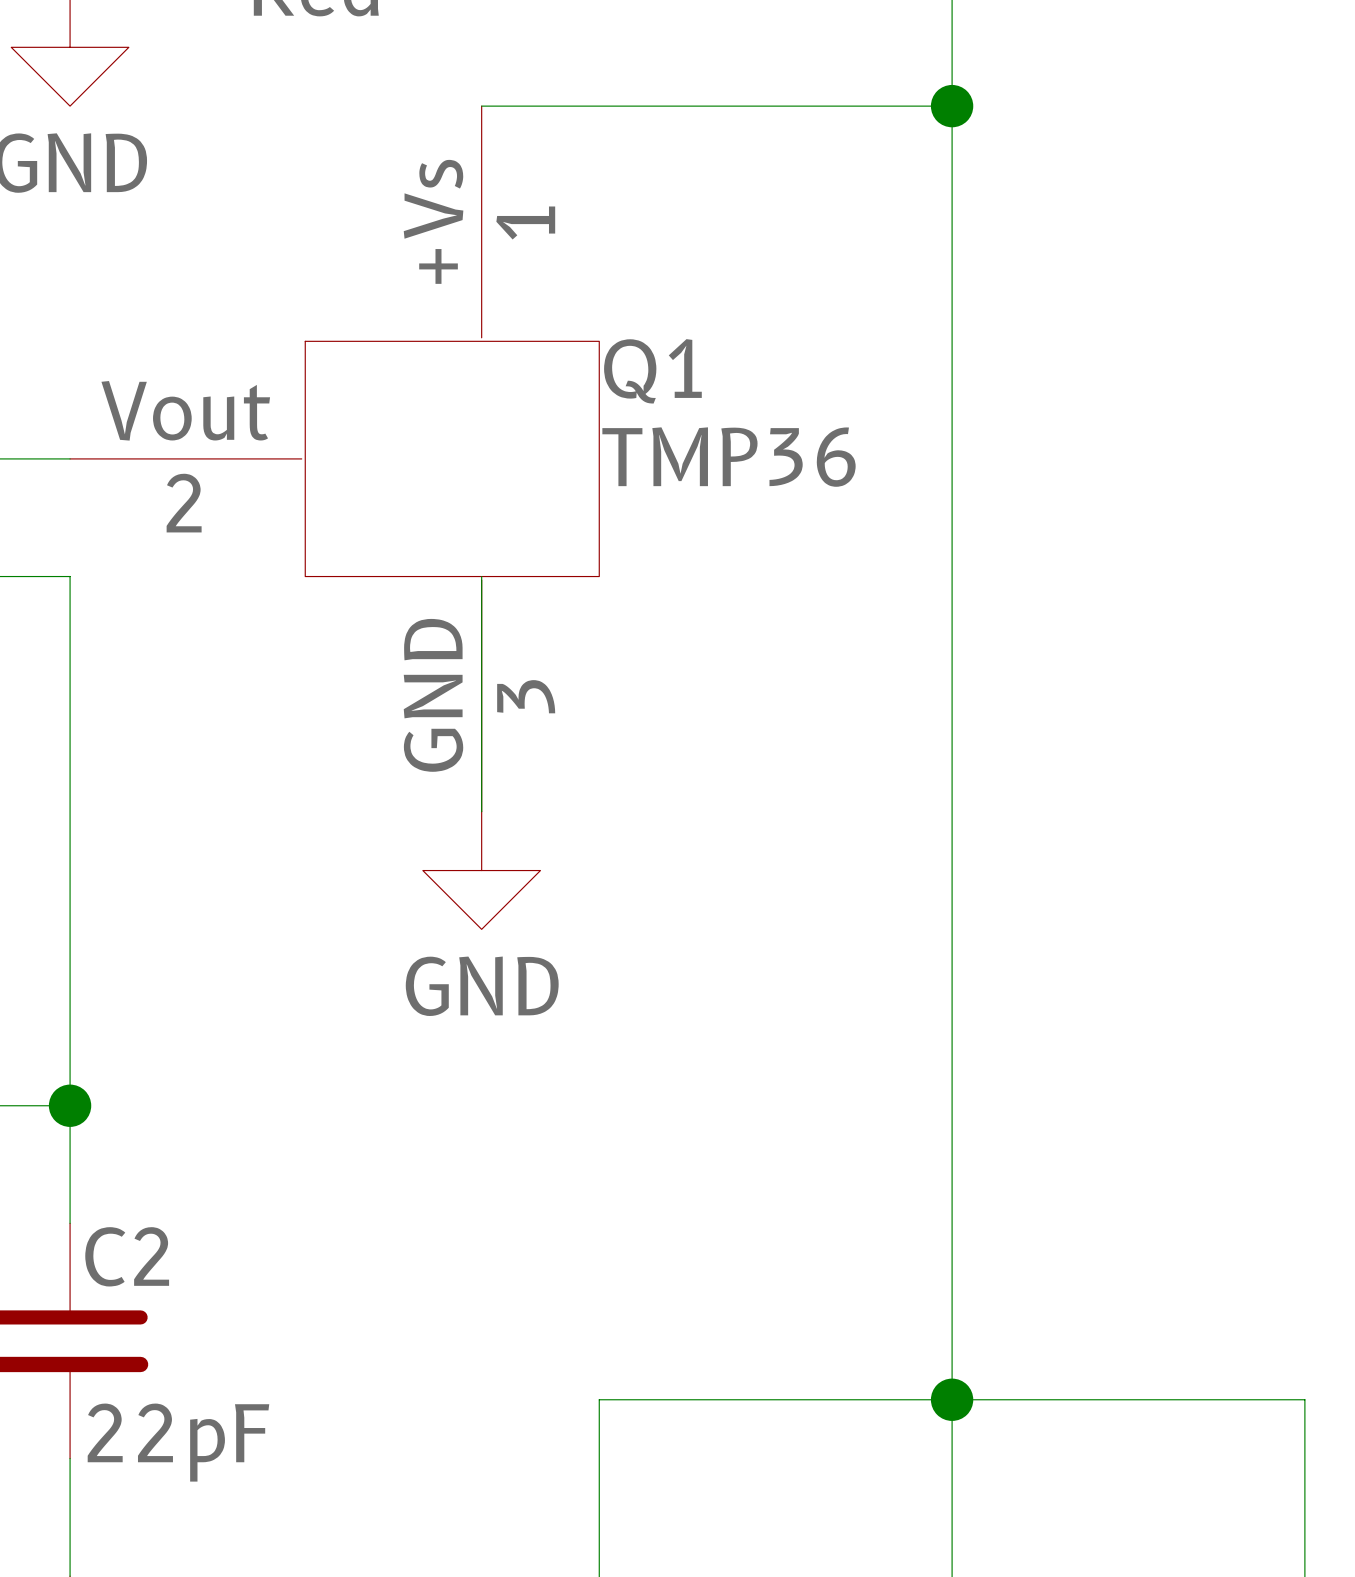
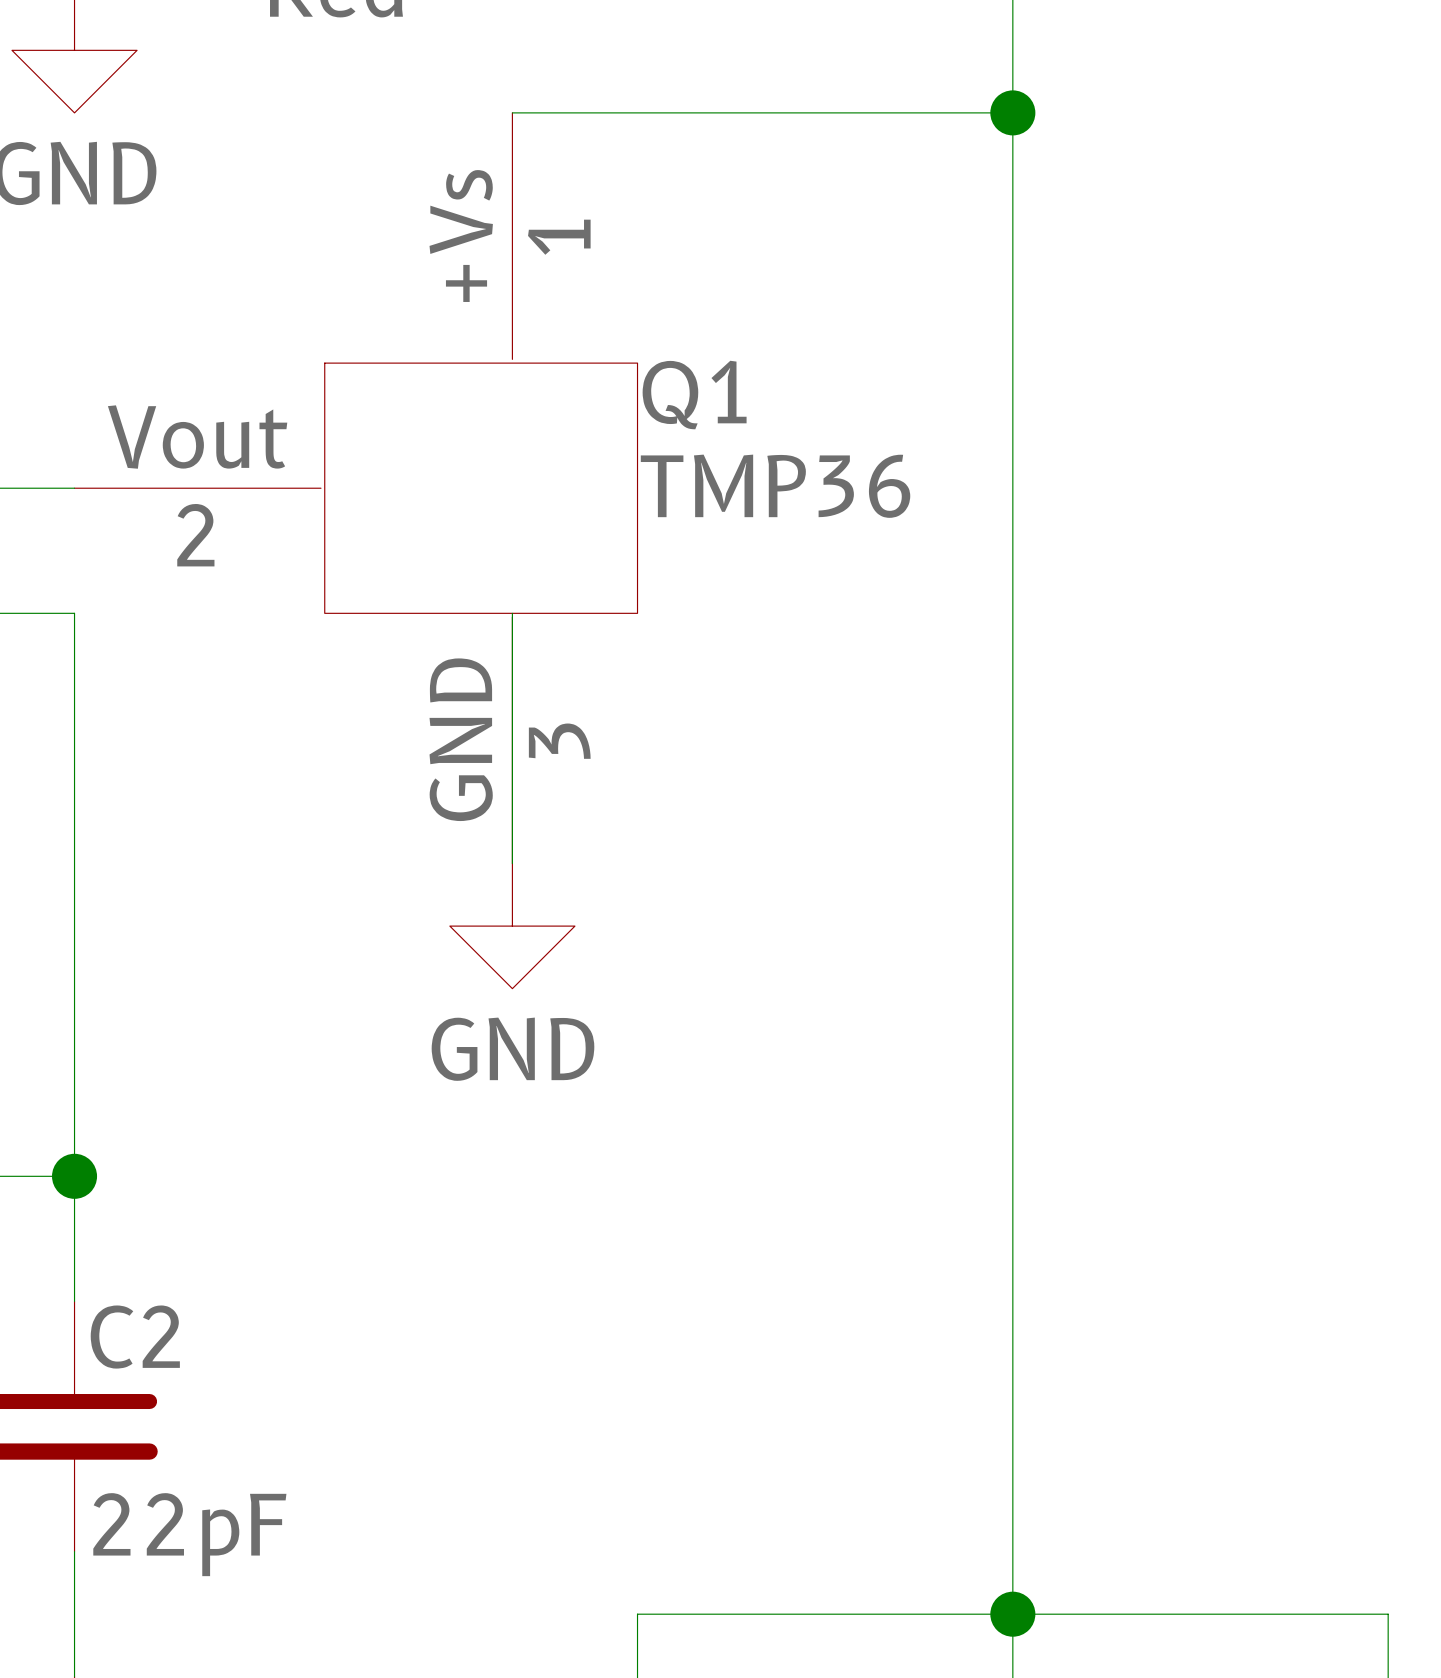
junction position: (952, 1399) -> (1012, 1614)
wire: (599, 1517) (599, 1399) (1304, 1399) (1304, 1517) -> (637, 1614) (1388, 1614)

